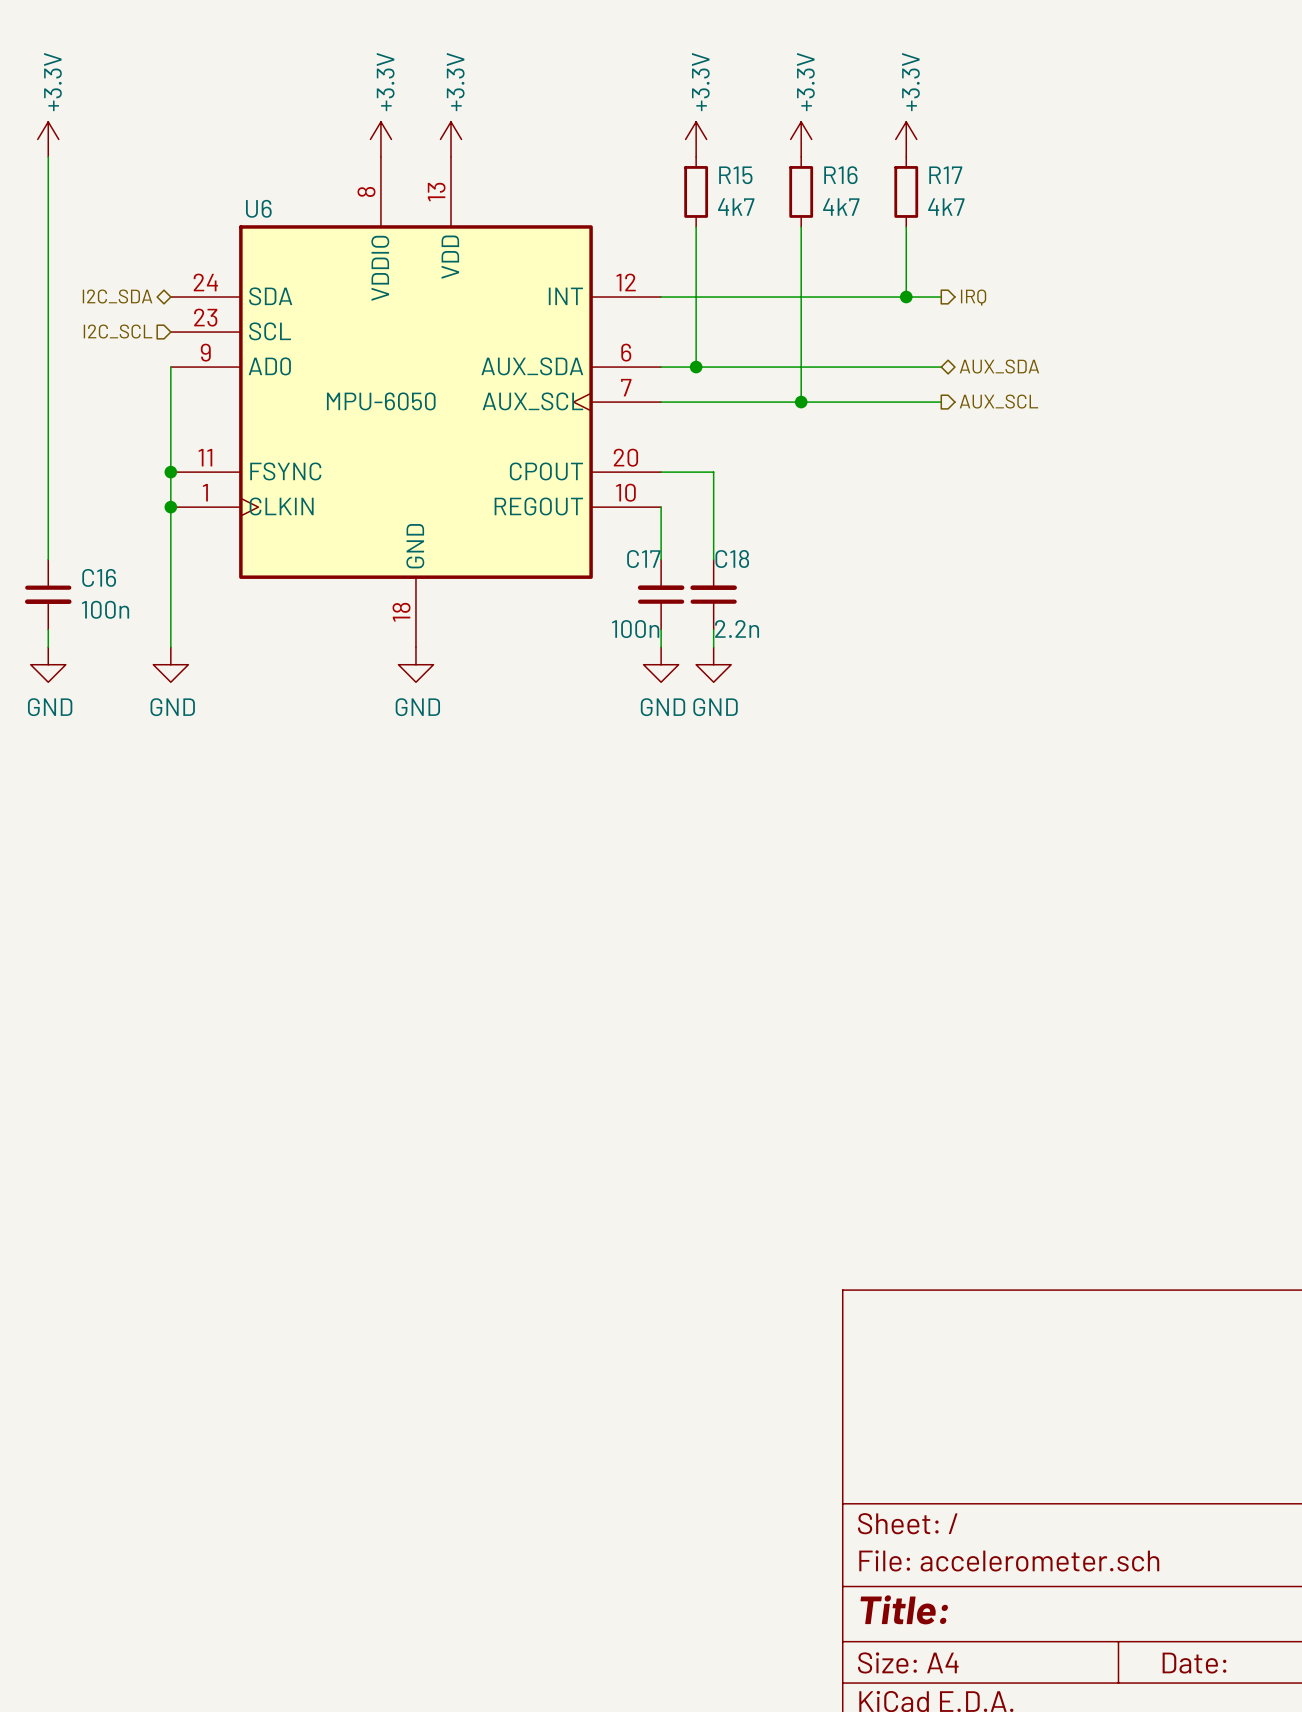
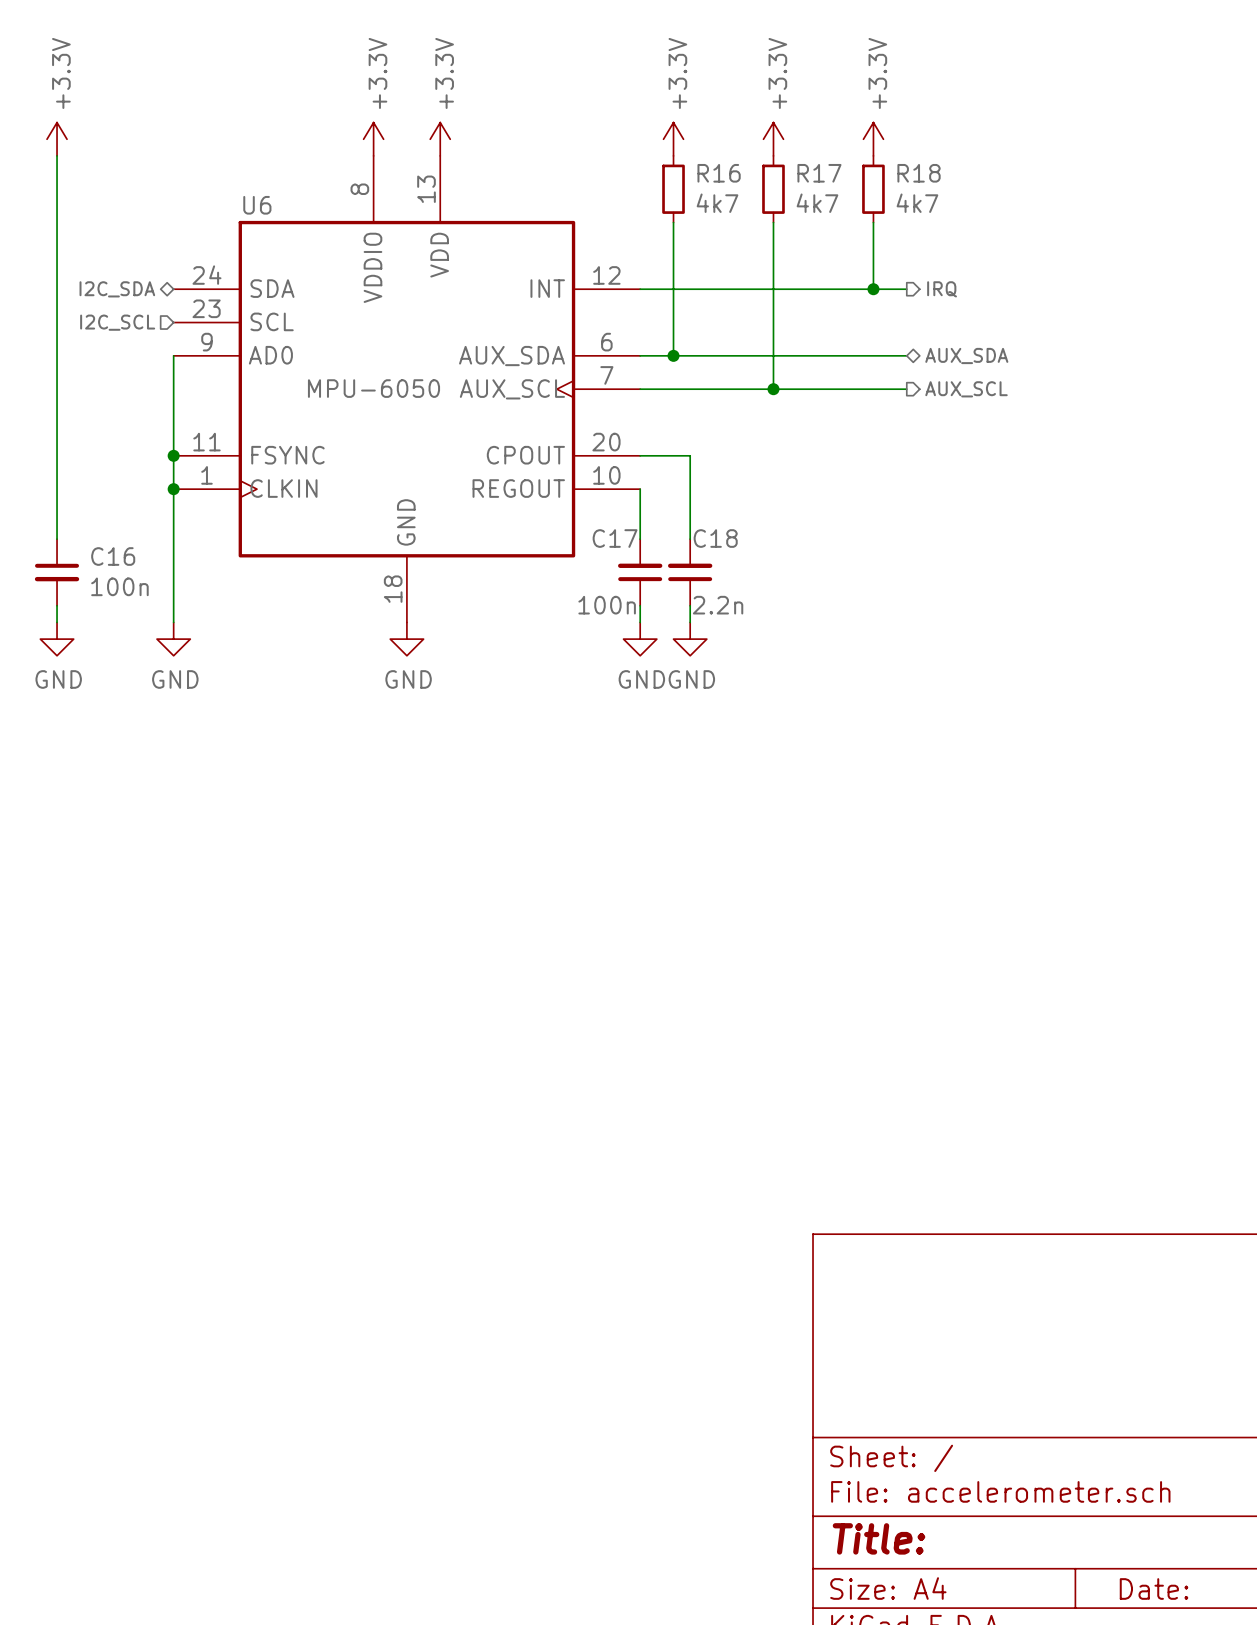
R15 name: R15 (735, 175) -> R16 (719, 173)
R16 name: R16 (840, 175) -> R17 (819, 173)
R17 name: R17 (945, 175) -> R18 (919, 173)

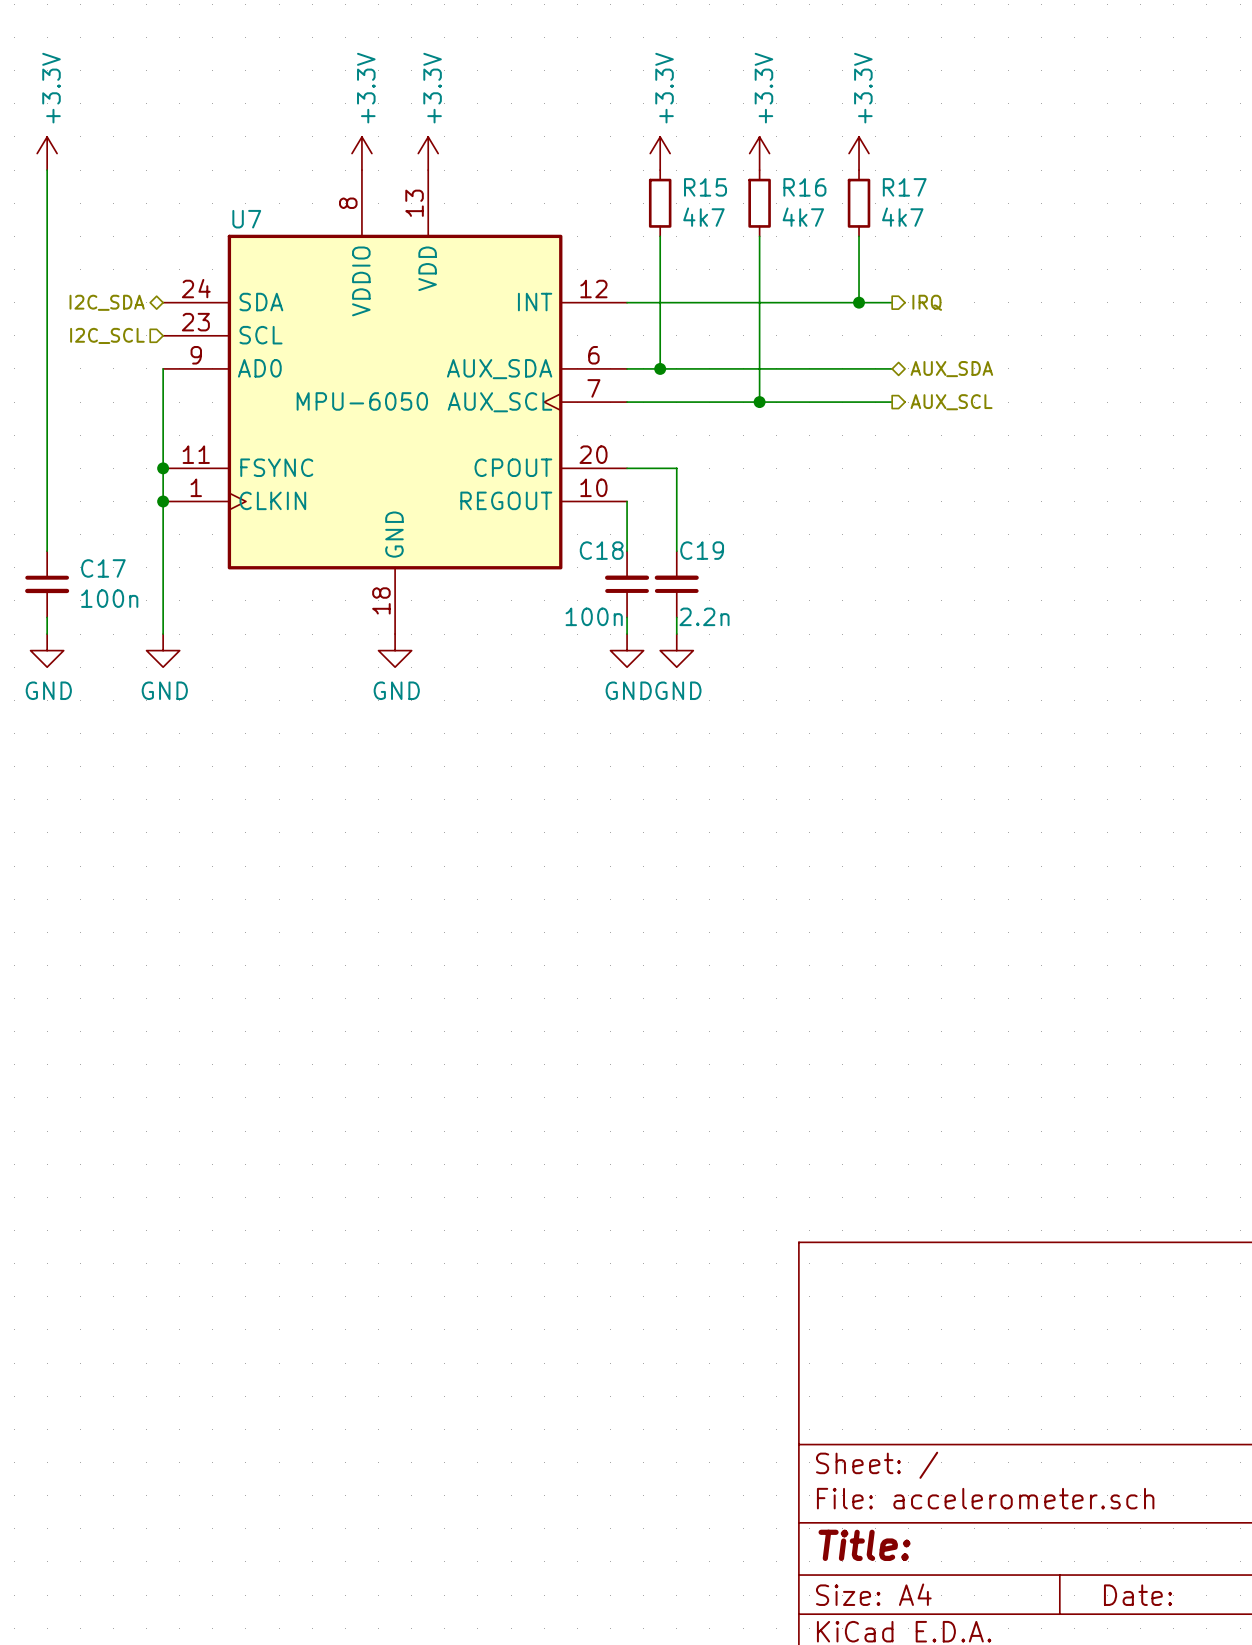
R16 name: R16 (719, 173) -> R15 (705, 187)
R17 name: R17 (819, 173) -> R16 (804, 187)
R18 name: R18 (919, 173) -> R17 (904, 187)
U6 name: U6 (257, 205) -> U7 (246, 219)
C17 name: C17 (615, 538) -> C18 (601, 550)
C18 name: C18 (715, 538) -> C19 (702, 550)
C16 name: C16 (113, 556) -> C17 (103, 568)

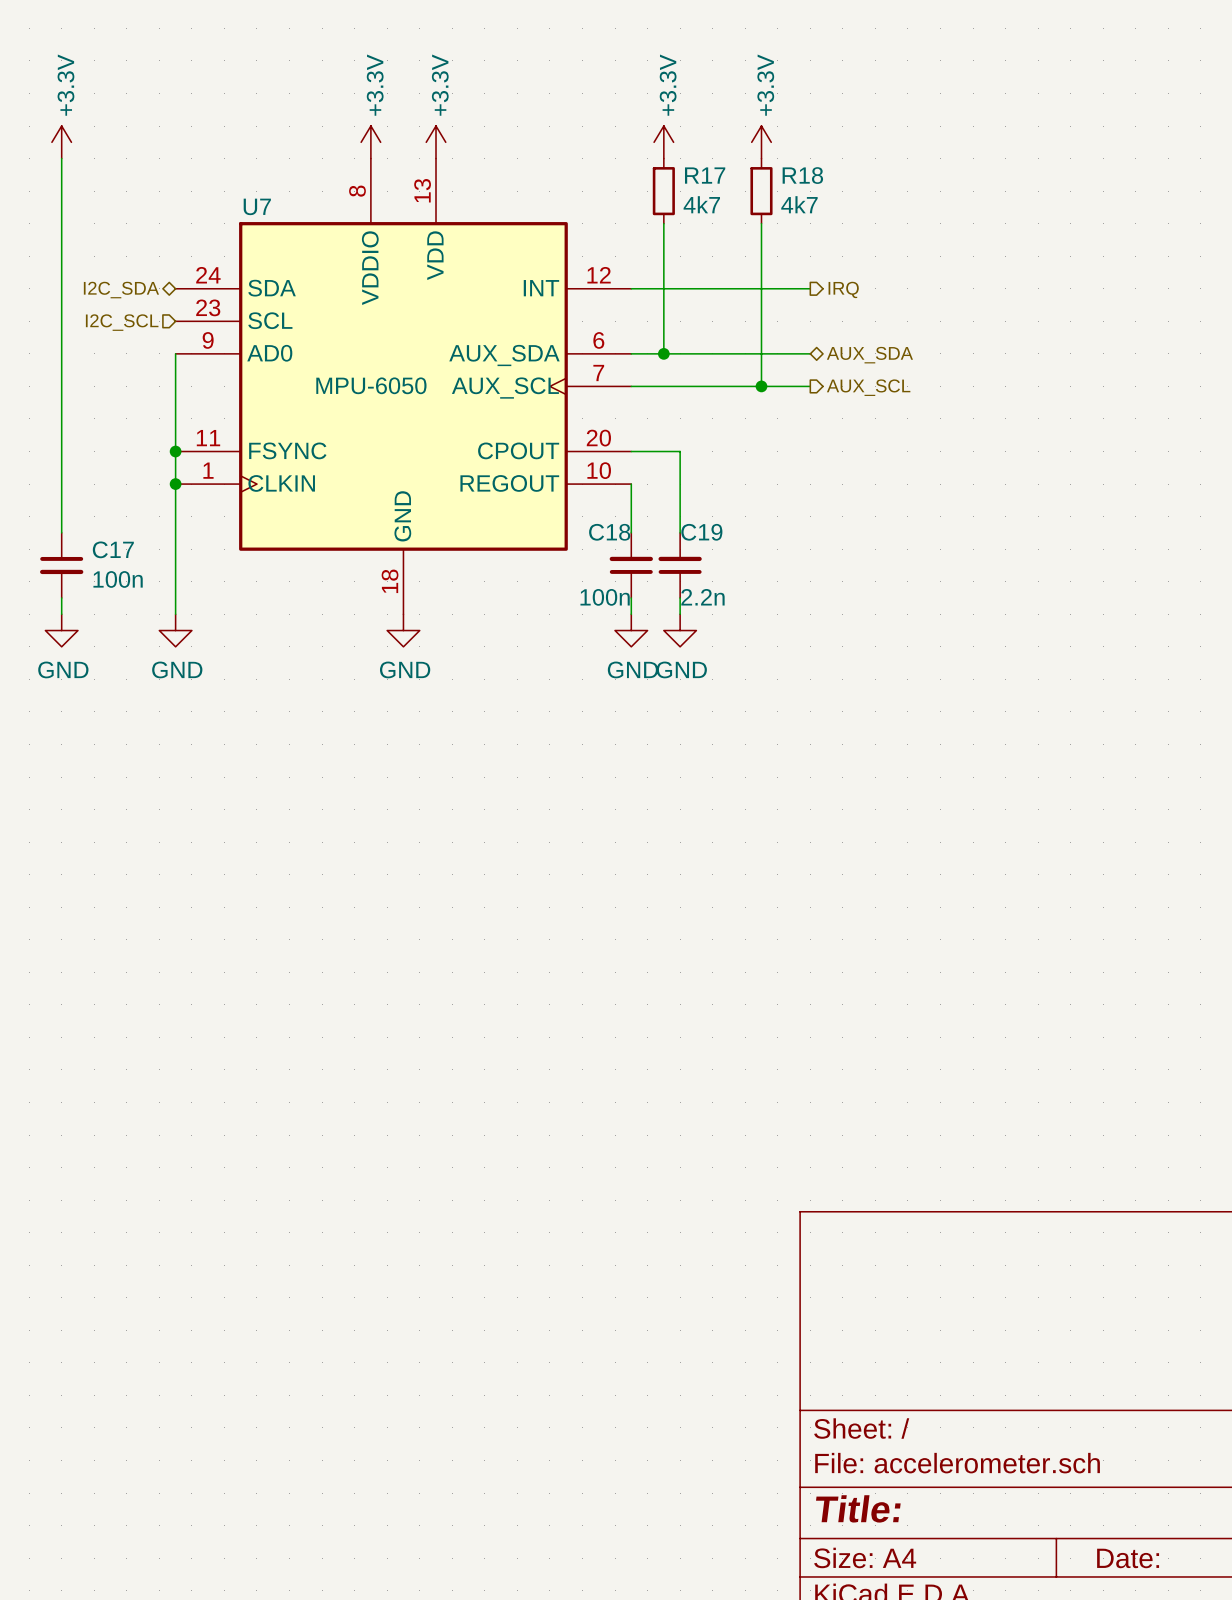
power symbol: +3.3V (859, 153) -> none
R15 name: R15 (705, 187) -> R17 (705, 175)
R16 name: R16 (804, 187) -> R18 (802, 175)
R17: 4k7 (859, 203) -> none
wire: (859, 236) (859, 302) -> none
wire: (809, 302) (892, 302) -> none
junction: (859, 302) -> none
hierarchical label position: IRQ (927, 302) -> IRQ (843, 289)
wire: (809, 368) (892, 368) -> none
hierarchical label position: AUX_SDA (951, 369) -> AUX_SDA (869, 355)
wire: (809, 402) (892, 402) -> none
hierarchical label position: AUX_SCL (951, 402) -> AUX_SCL (868, 387)

